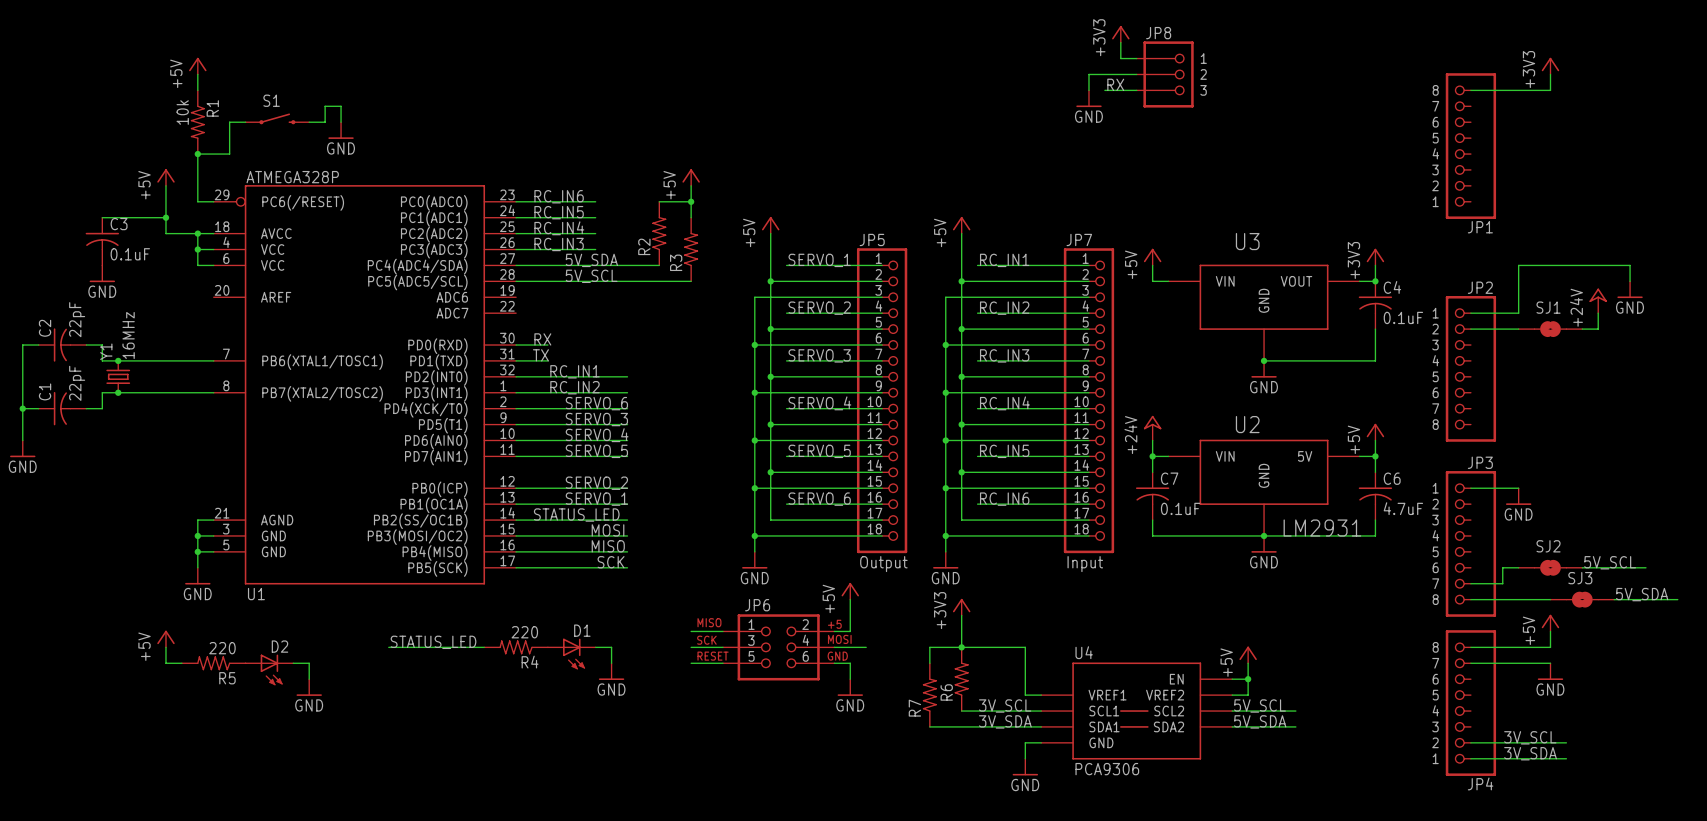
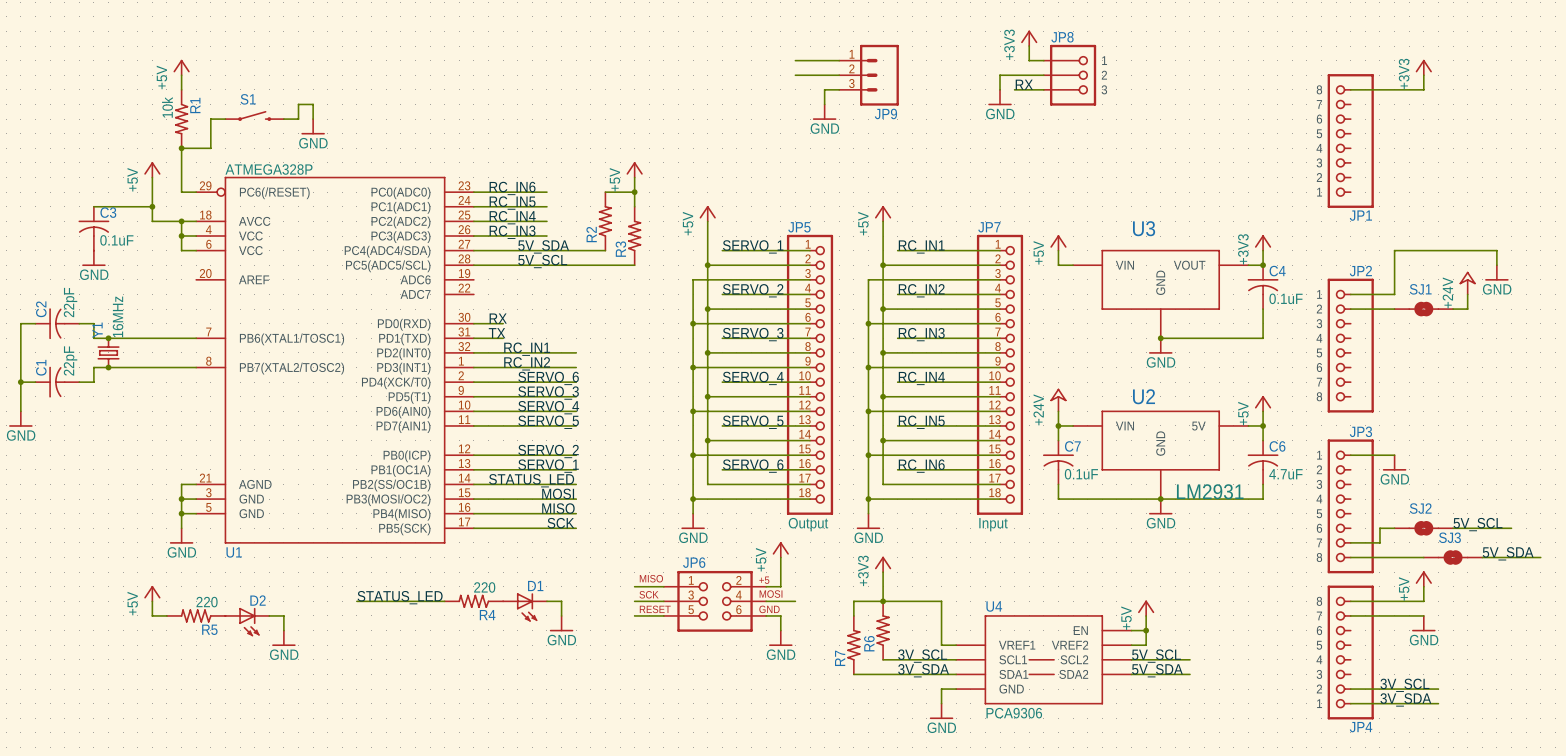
wire: none -> (795, 60) (839, 60)
wire: none -> (795, 75) (839, 75)
JP9: none -> (869, 75)
wire: none -> (839, 89) (824, 89) (824, 104)
power symbol: none -> GND (824, 112)

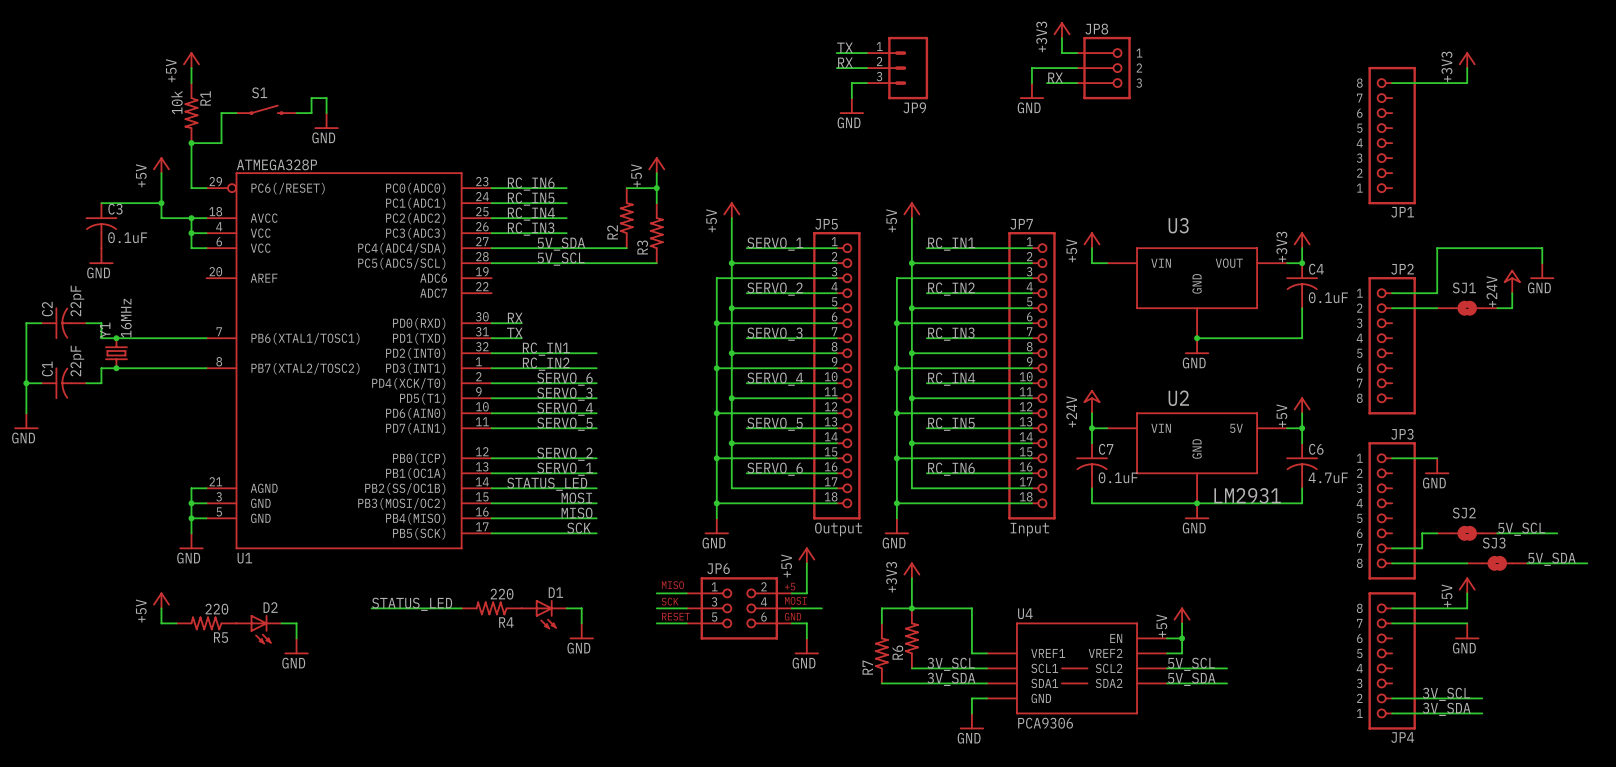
label: none -> TX (844, 47)
wire: (795, 60) (810, 60) -> none
label: none -> RX (845, 62)
wire: (795, 75) (810, 75) -> none

